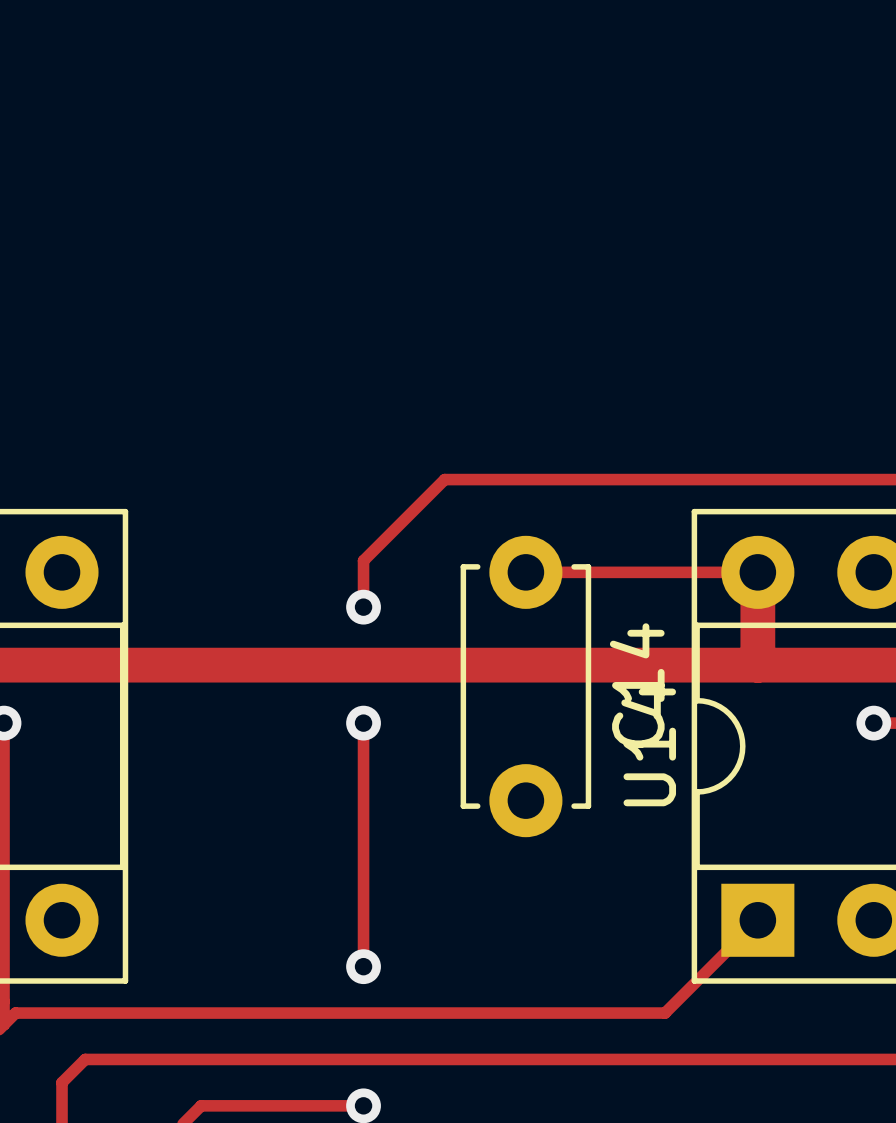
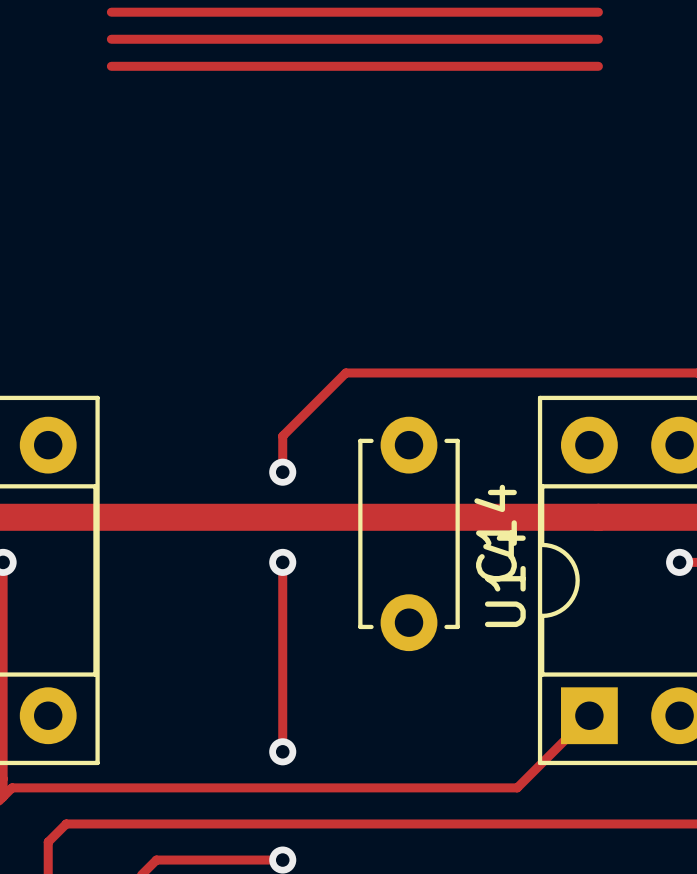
track: none -> (111, 12) (598, 12)
track: none -> (111, 39) (598, 39)
track: none -> (111, 66) (598, 66)
track: (525, 572) (757, 572) (757, 665) -> none

